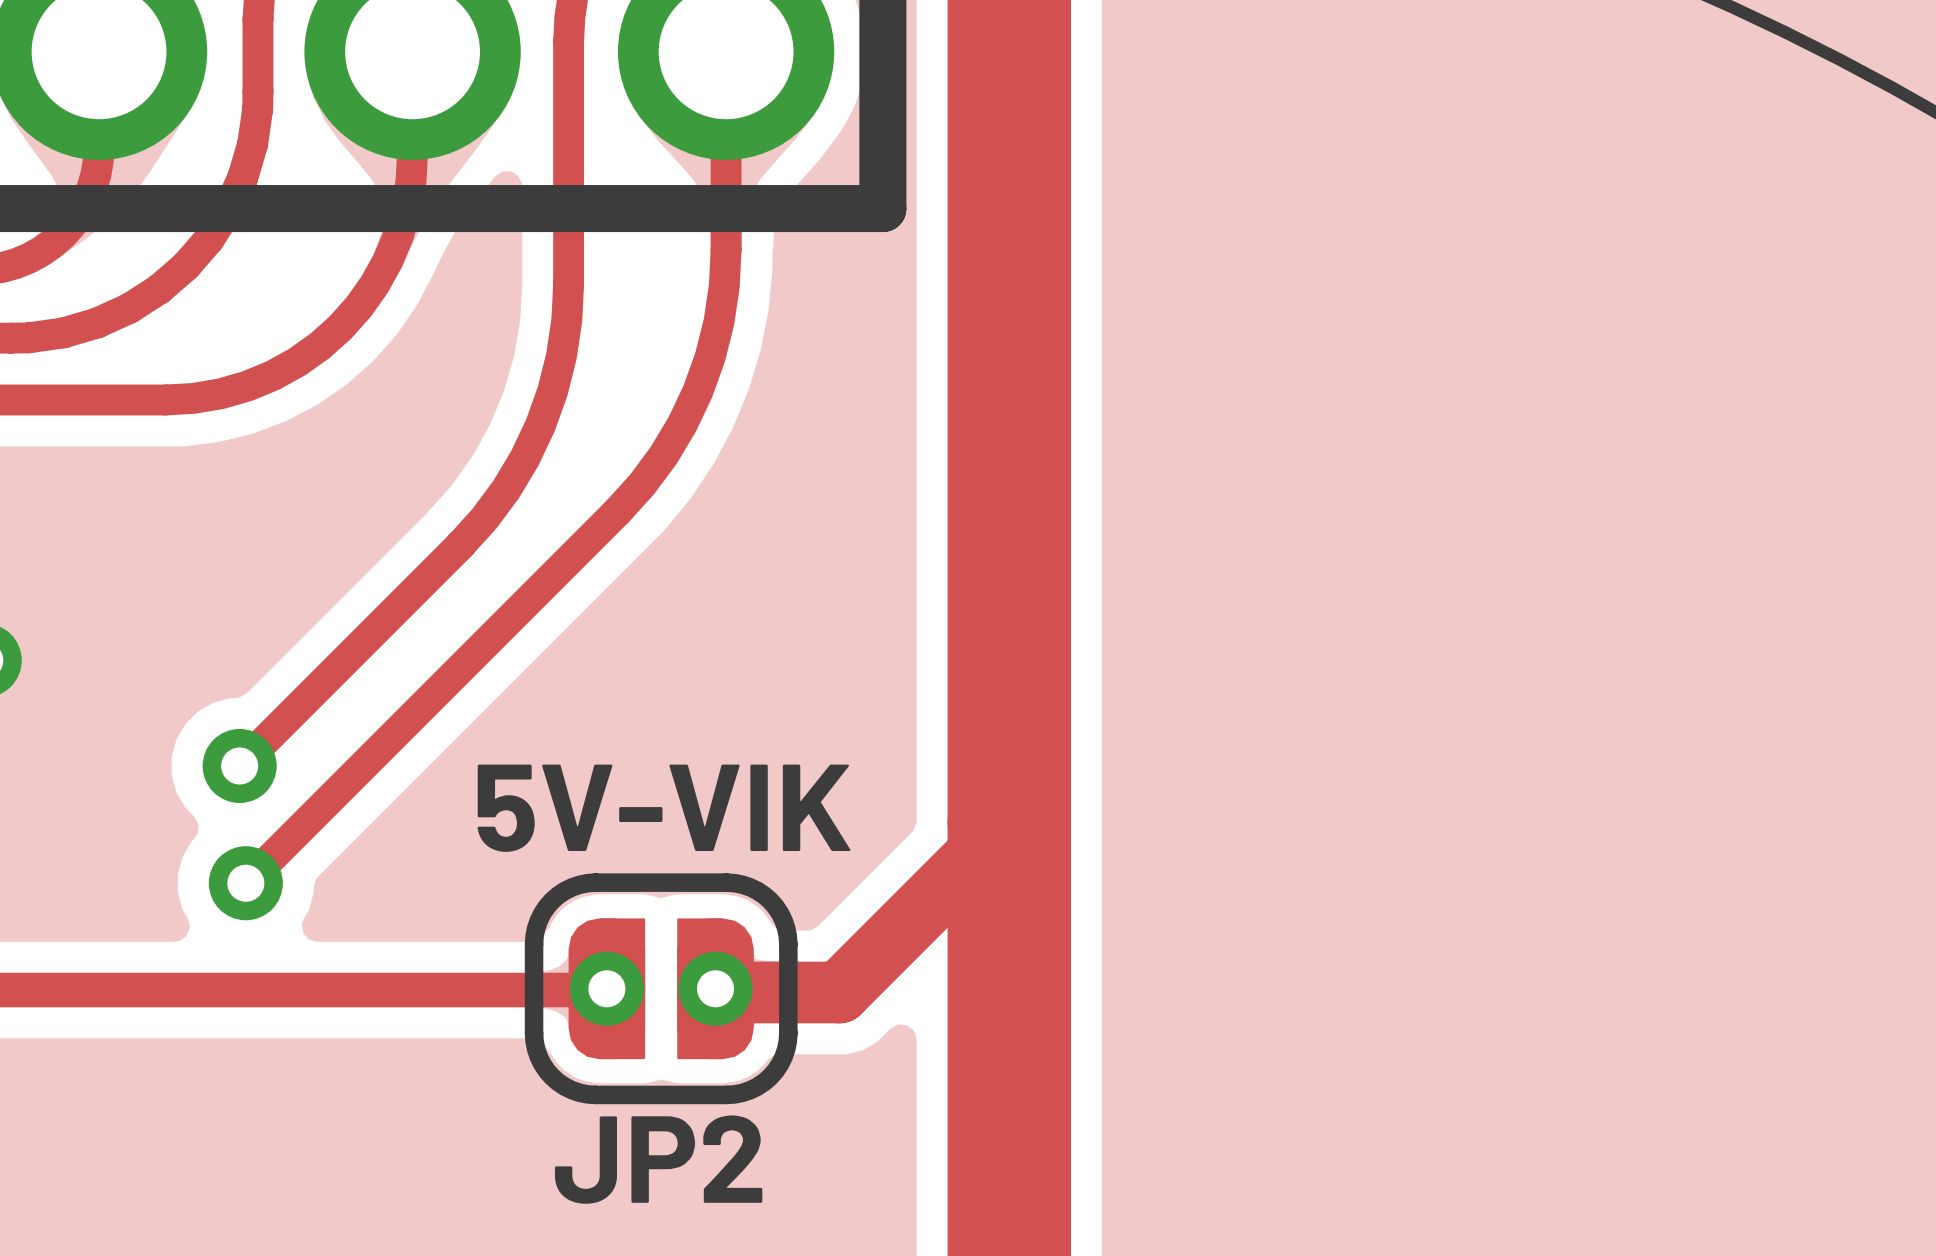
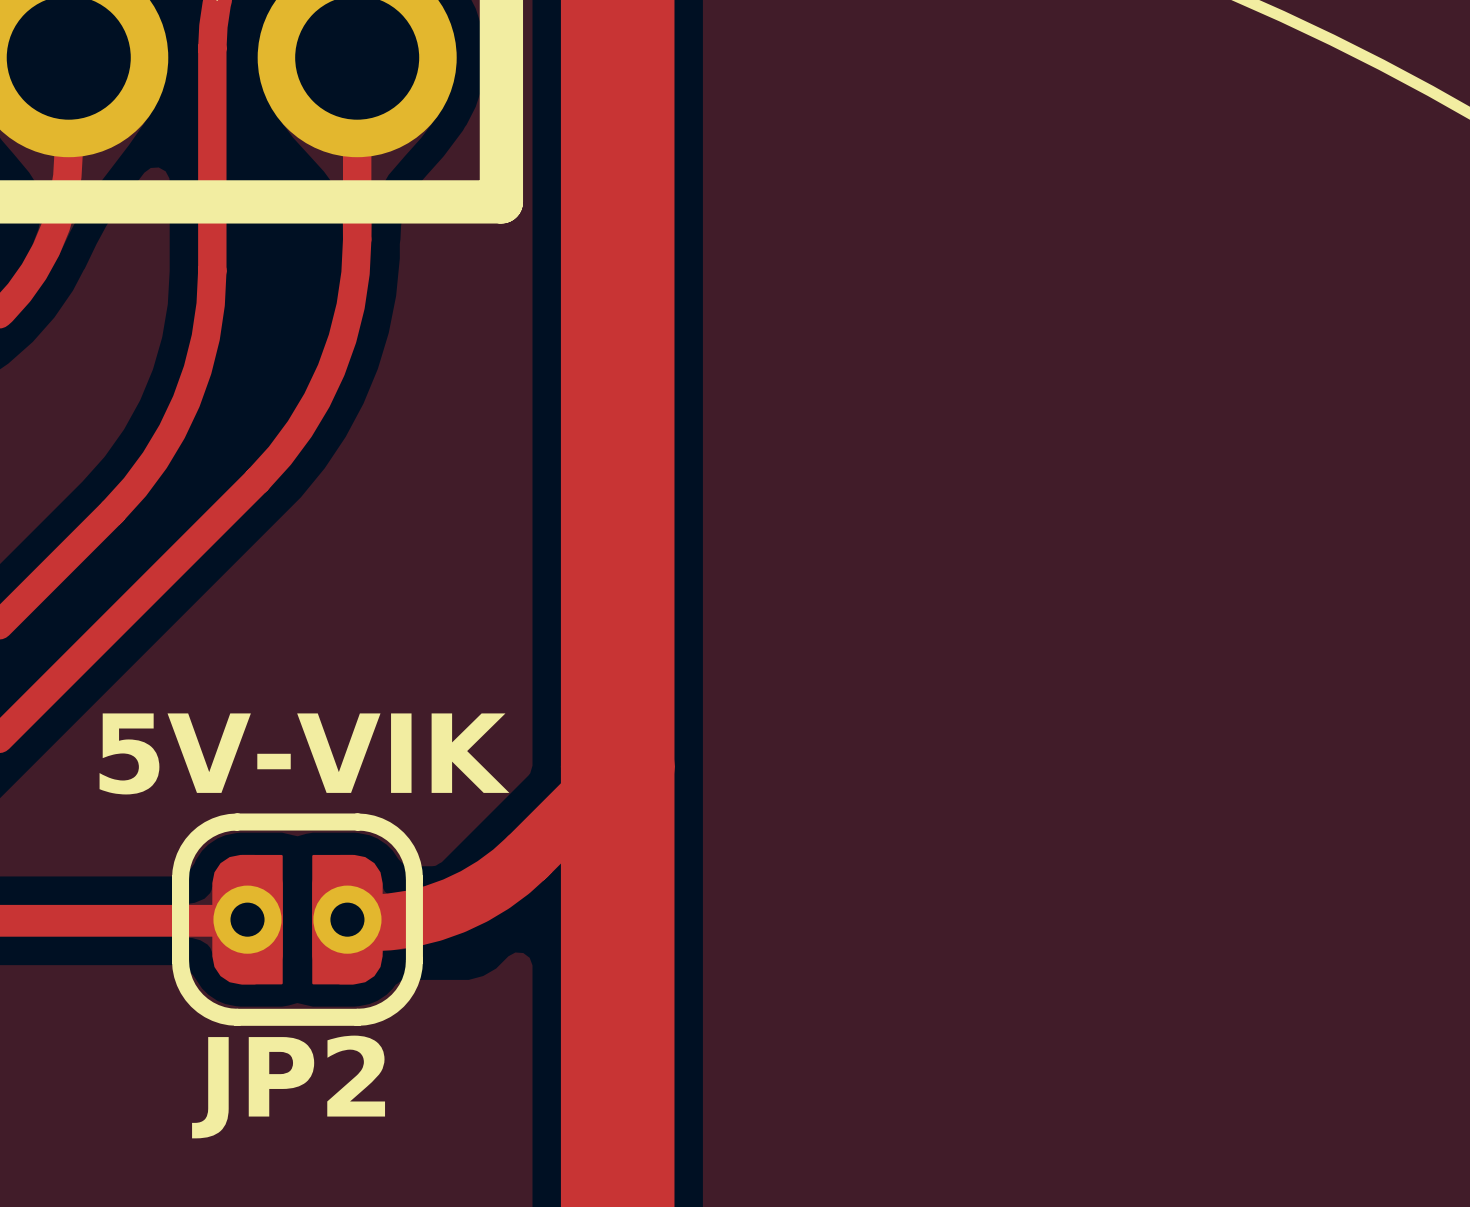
track: (911, 920) (839, 992) (737, 992) -> (527, 856) (493, 884) (454, 905) (411, 918) (367, 923)

